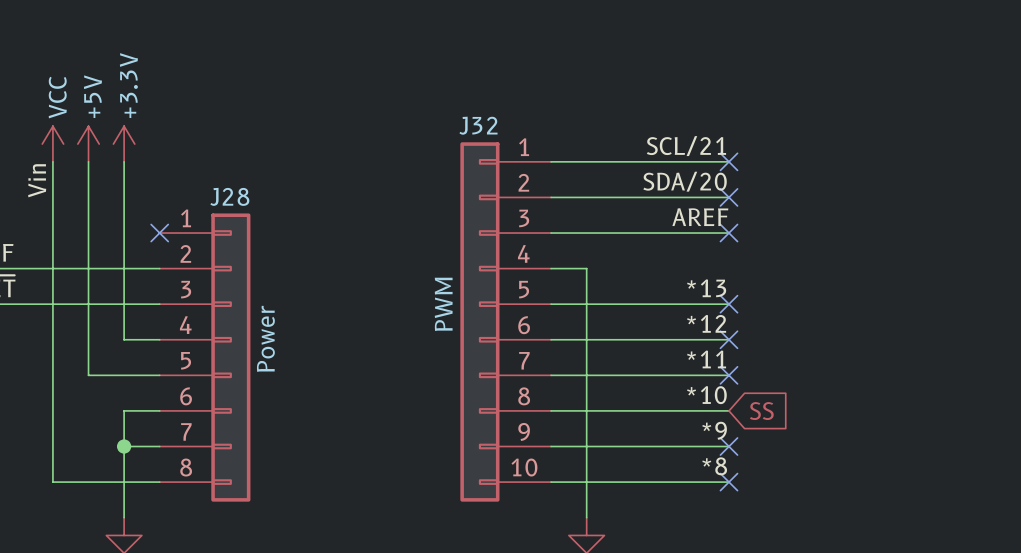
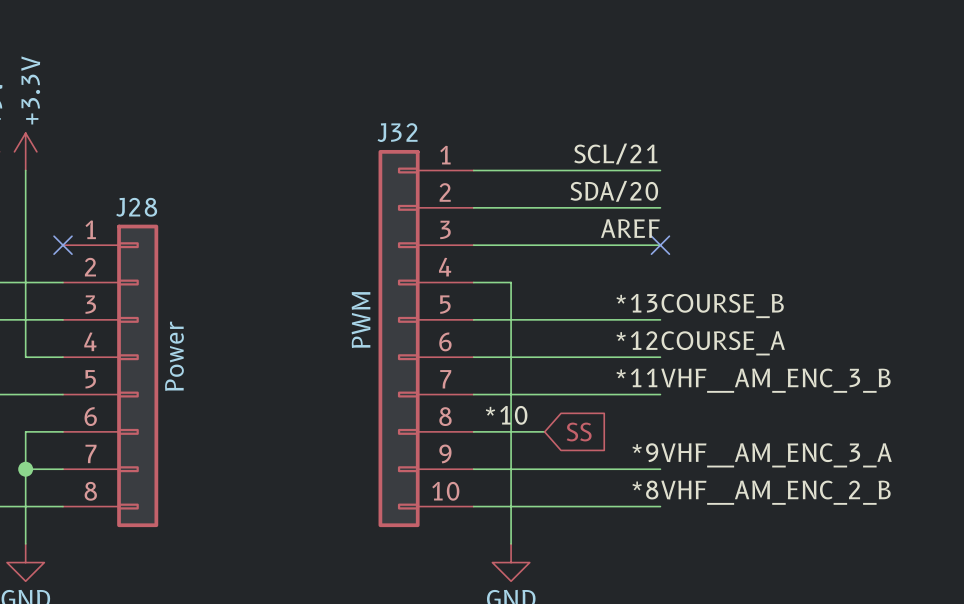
no-connect mark: (728, 161) -> none
no-connect mark: (728, 197) -> none
label: none -> COURSE_B (722, 306)
no-connect mark: (728, 304) -> none
label: none -> COURSE_A (723, 343)
no-connect mark: (728, 339) -> none
label: none -> VHF__AM_ENC_3_B (775, 380)
no-connect mark: (728, 375) -> none
label position: *10 (706, 395) -> *10 (506, 415)
wire: (618, 410) (728, 410) -> none
global label position: SS (761, 411) -> SS (579, 432)
label: none -> VHF__AM_ENC_3_A (776, 455)
no-connect mark: (728, 446) -> none
label: none -> VHF__AM_ENC_2_B (775, 492)
no-connect mark: (728, 482) -> none

